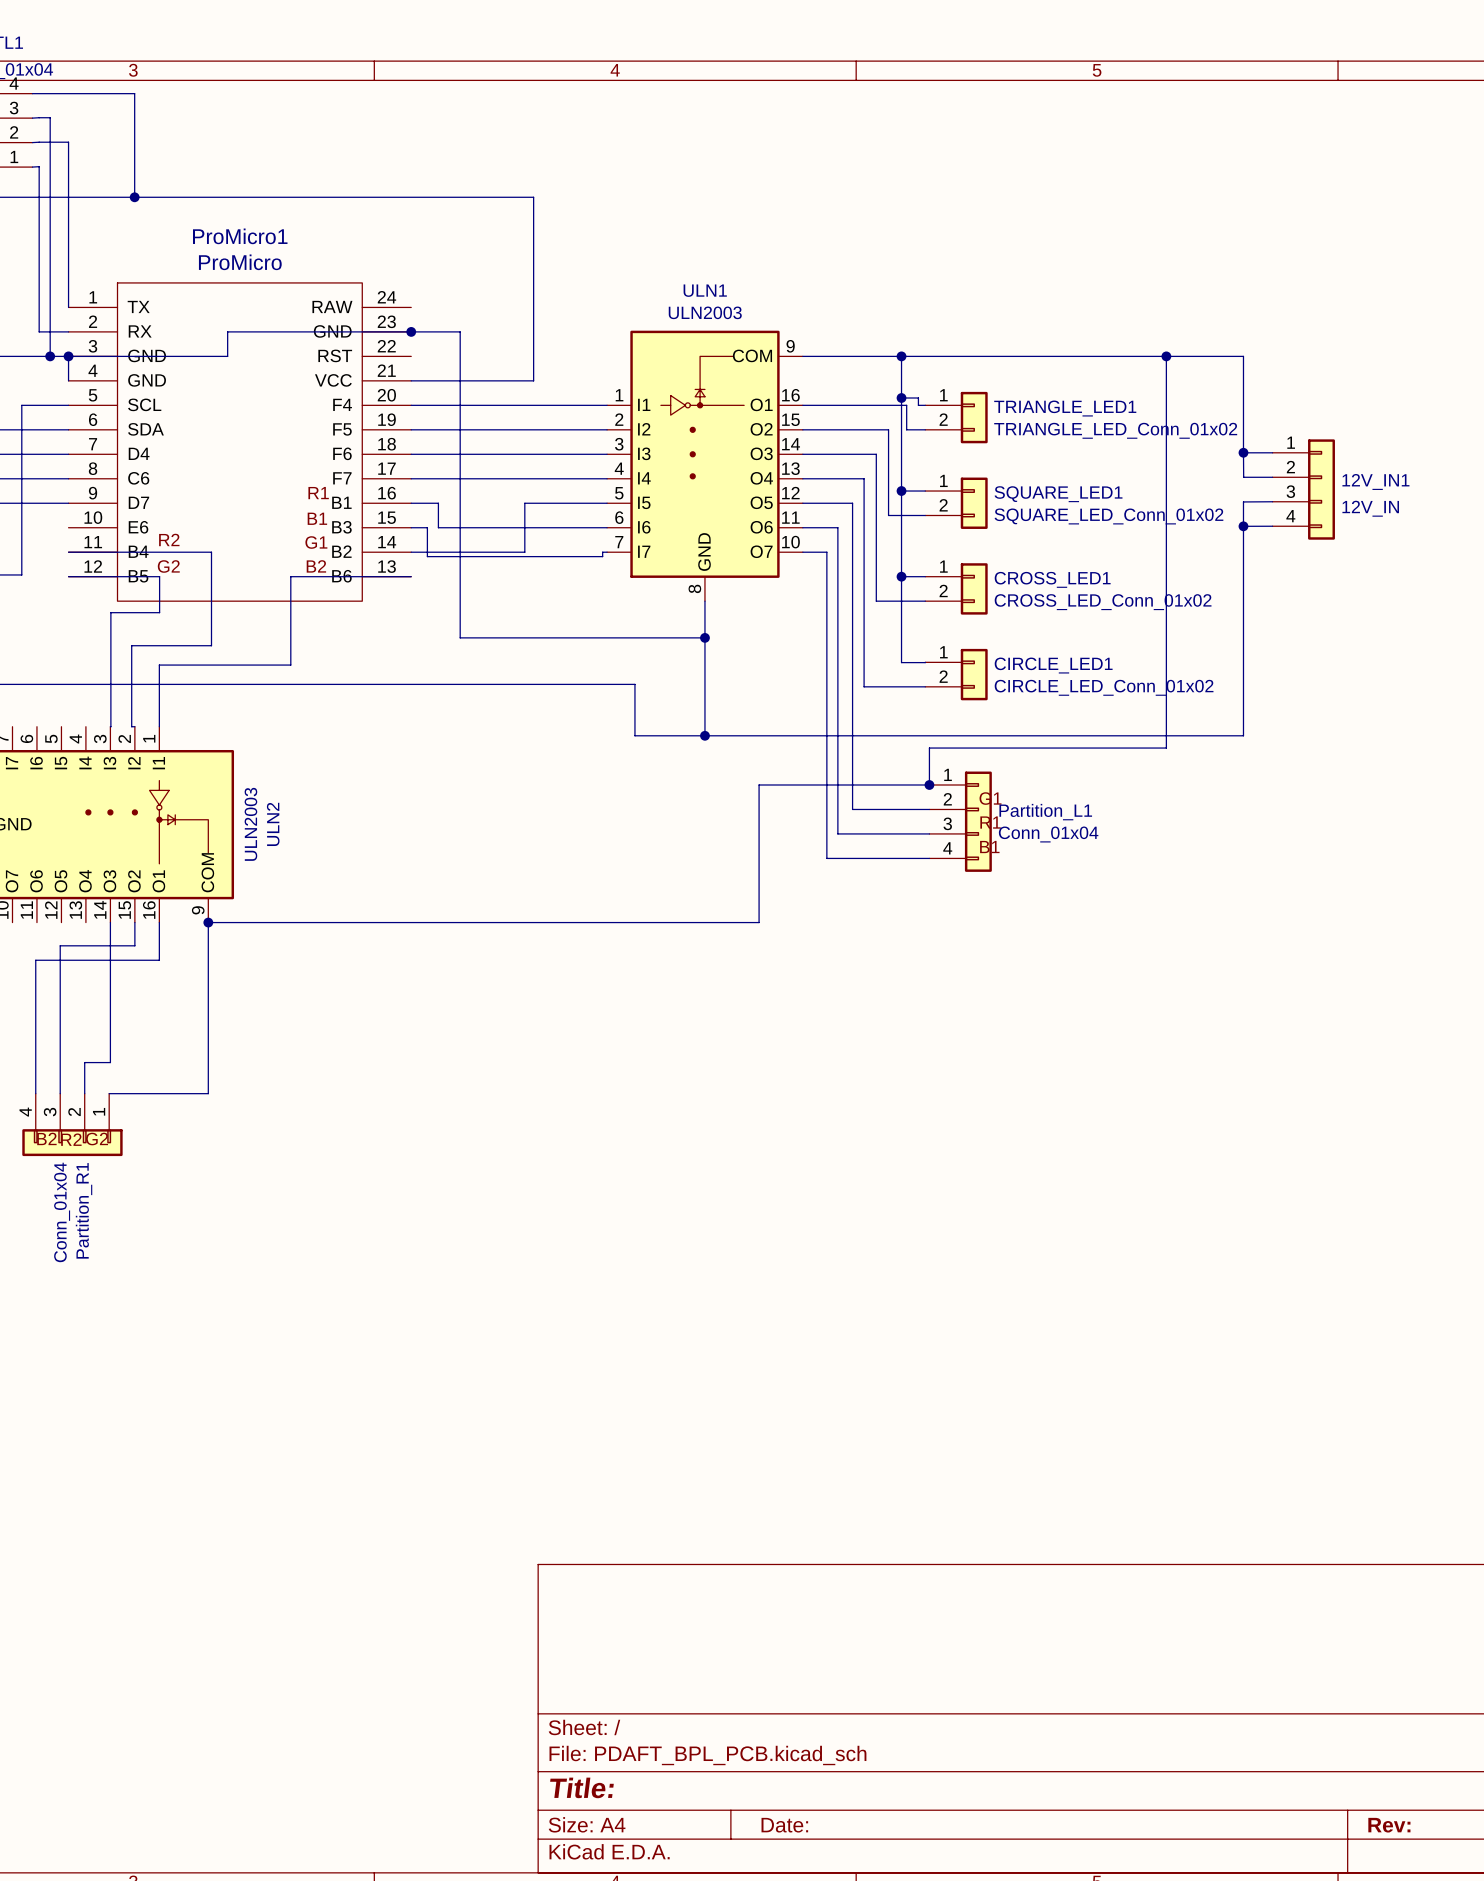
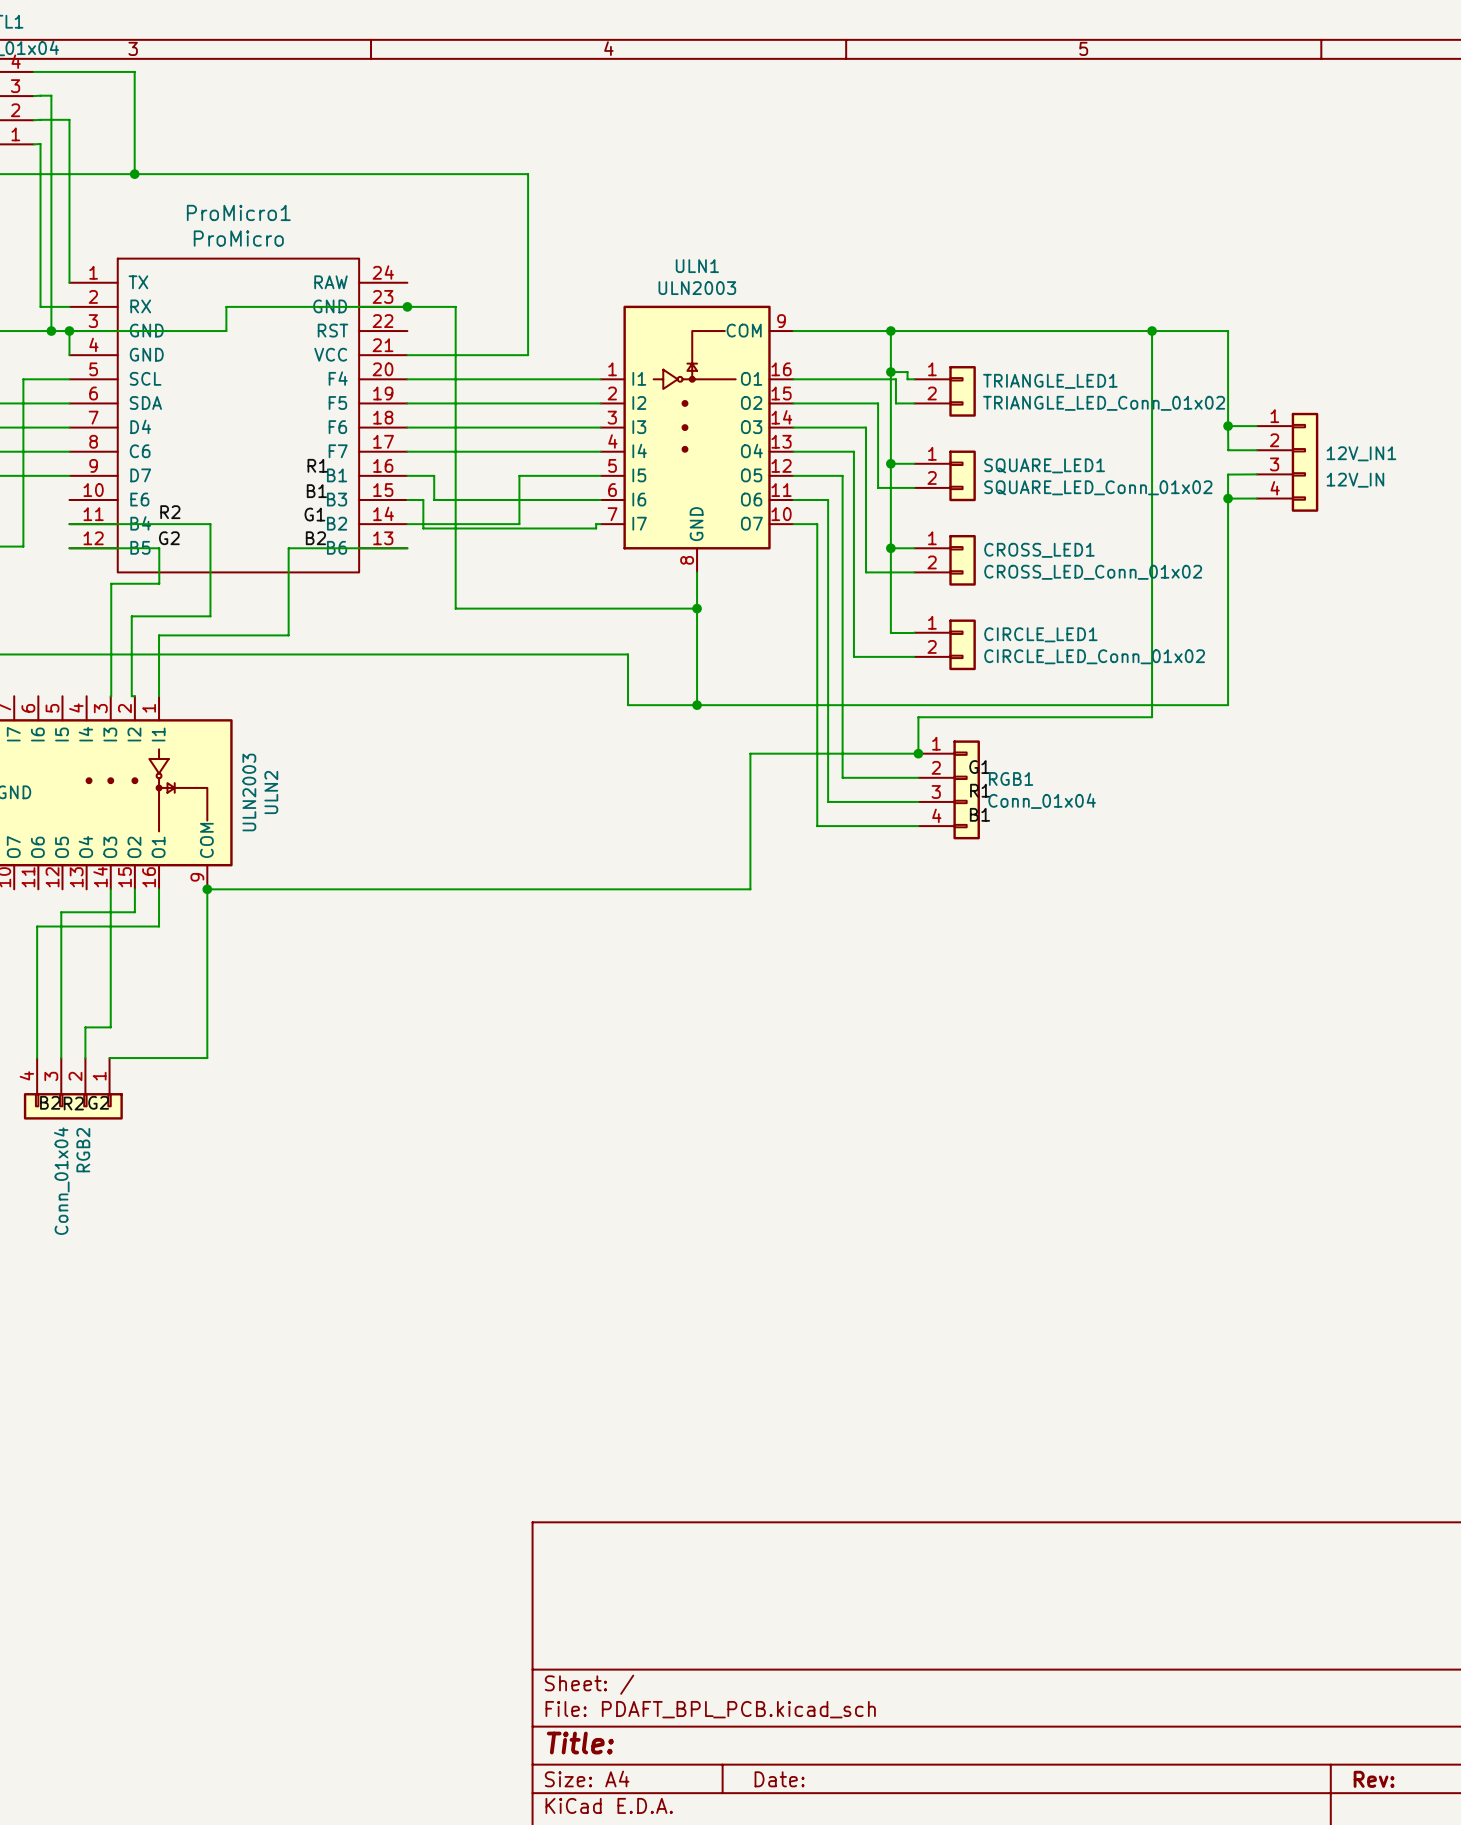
Partition_L1 name: Partition_L1 (1045, 812) -> RGB1 (1011, 778)
Partition_R1 name: Partition_R1 (84, 1210) -> RGB2 (83, 1150)

